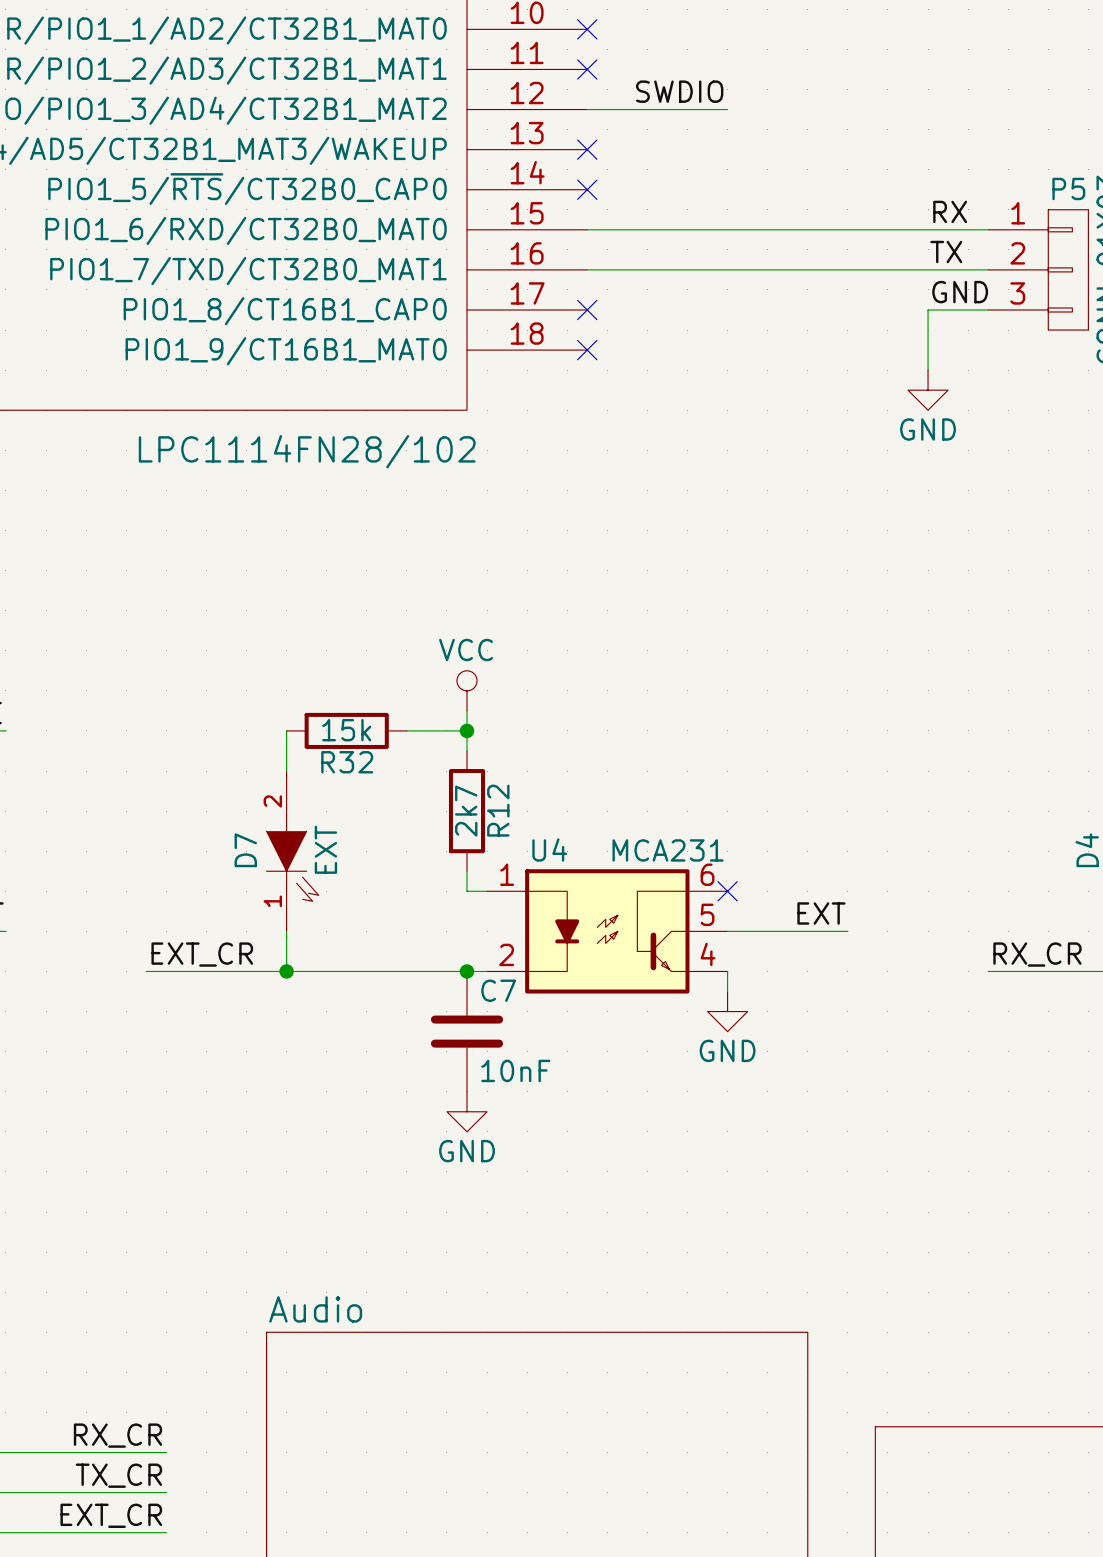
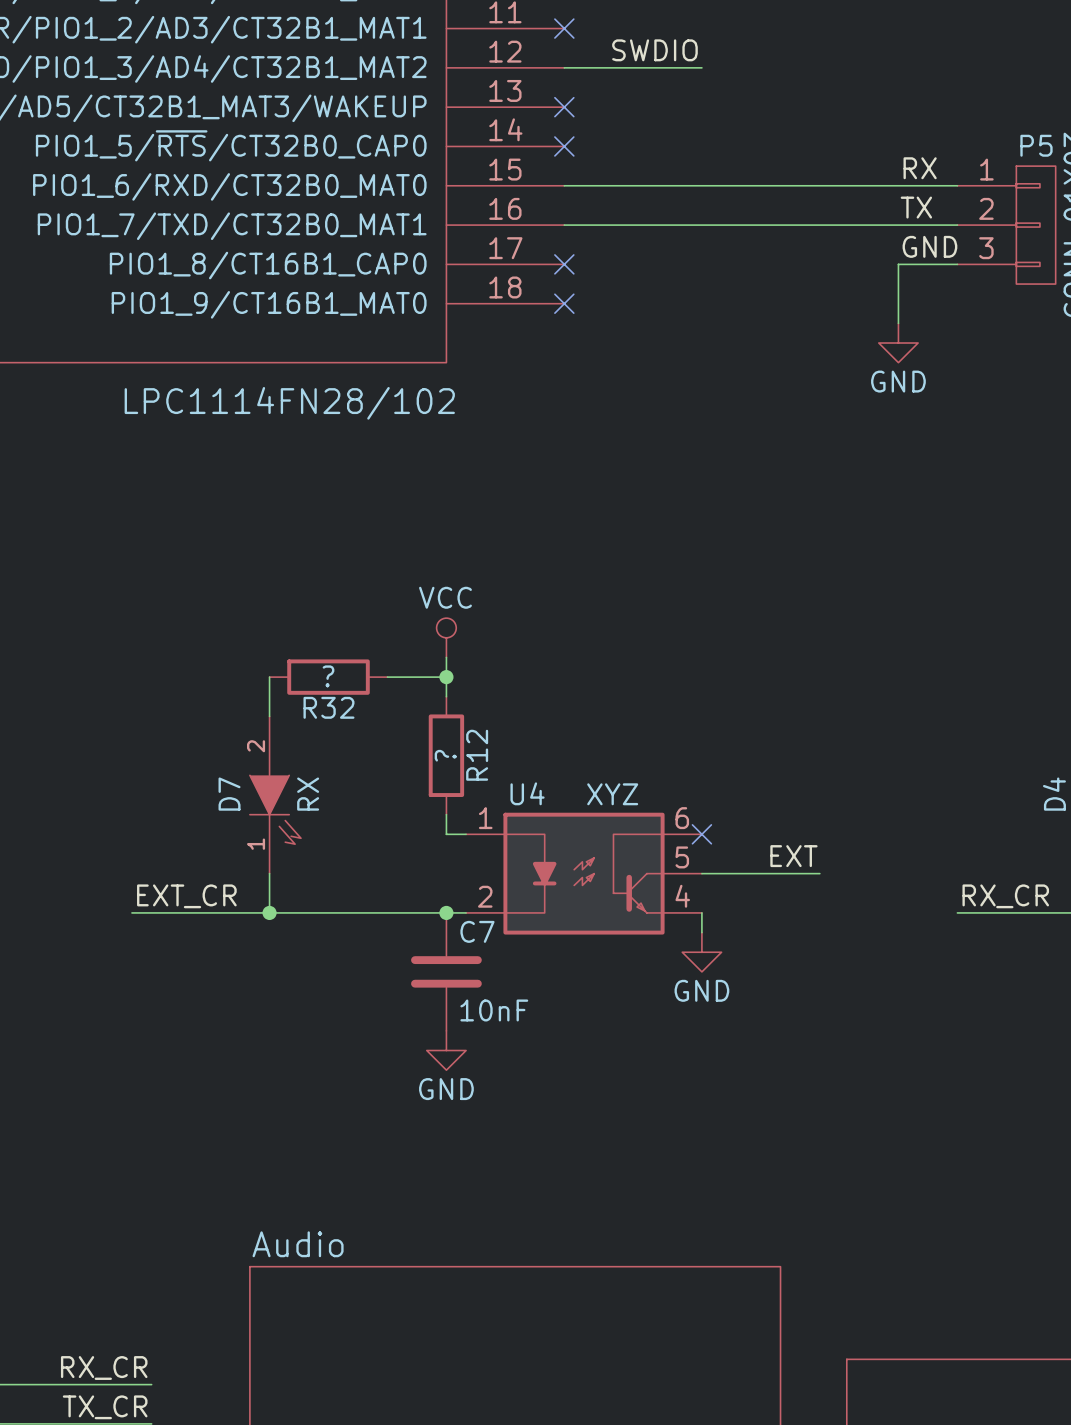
R32 value: 15k (346, 730) -> ? (328, 676)
R12 value: 2k7 (466, 811) -> ? (445, 755)
D7 value: EXT (325, 849) -> RX (308, 794)
U4 value: MCA231 (668, 850) -> XYZ (612, 794)

